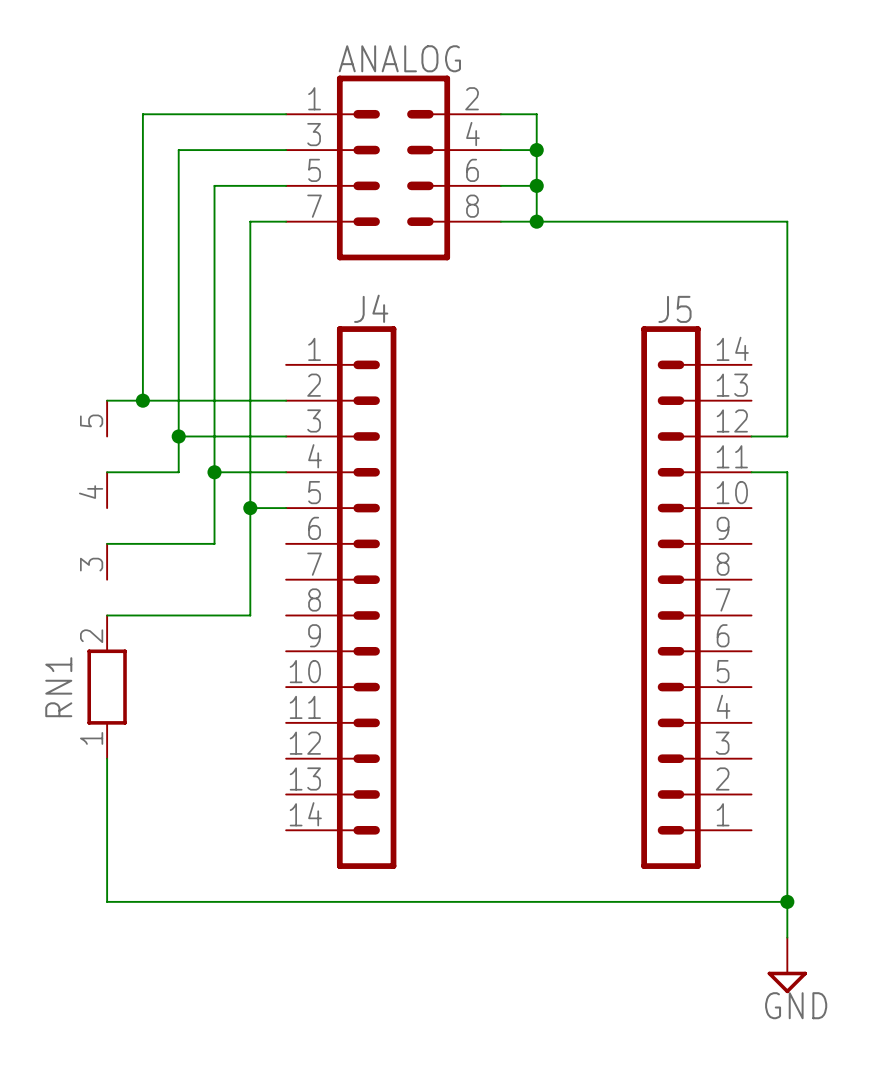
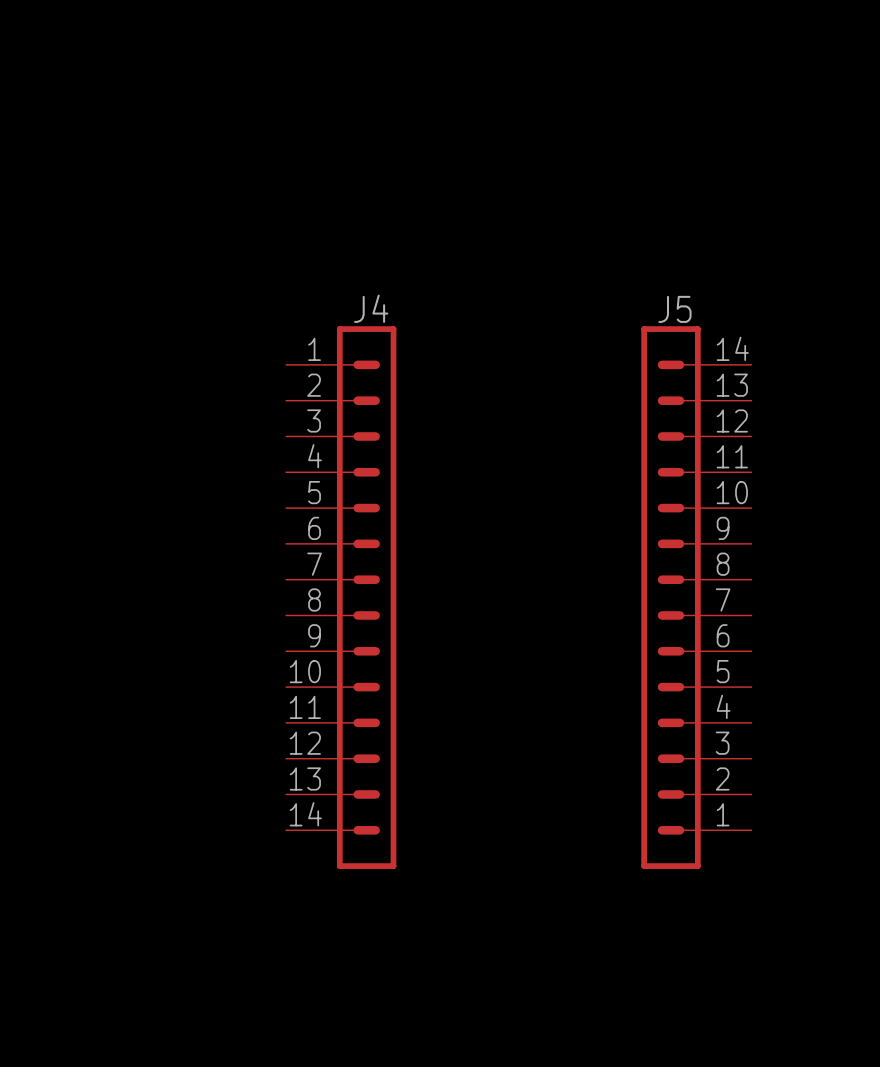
wire: (286, 114) (142, 114) (142, 400) -> none
wire: (500, 114) (536, 114) (536, 221) -> none
wire: (286, 150) (178, 150) (178, 472) (107, 472) -> none
wire: (500, 150) (536, 150) -> none
junction: (536, 150) -> none
ANALOG: (393, 167) -> none
wire: (286, 185) (214, 185) (214, 543) (107, 543) -> none
wire: (500, 185) (536, 185) -> none
junction: (536, 185) -> none
wire: (286, 221) (250, 221) (250, 615) (107, 615) -> none
wire: (500, 221) (787, 221) (787, 436) (751, 436) -> none
junction: (536, 221) -> none
wire: (107, 400) (286, 400) -> none
junction: (142, 400) -> none
wire: (178, 436) (286, 436) -> none
junction: (178, 436) -> none
wire: (214, 472) (286, 472) -> none
junction: (214, 472) -> none
wire: (751, 472) (787, 472) (787, 937) -> none
wire: (250, 508) (286, 508) -> none
junction: (250, 508) -> none
RN1: (107, 579) -> none
wire: (107, 758) (107, 901) (787, 901) -> none
junction: (787, 901) -> none
power symbol: GND (787, 965) -> none

